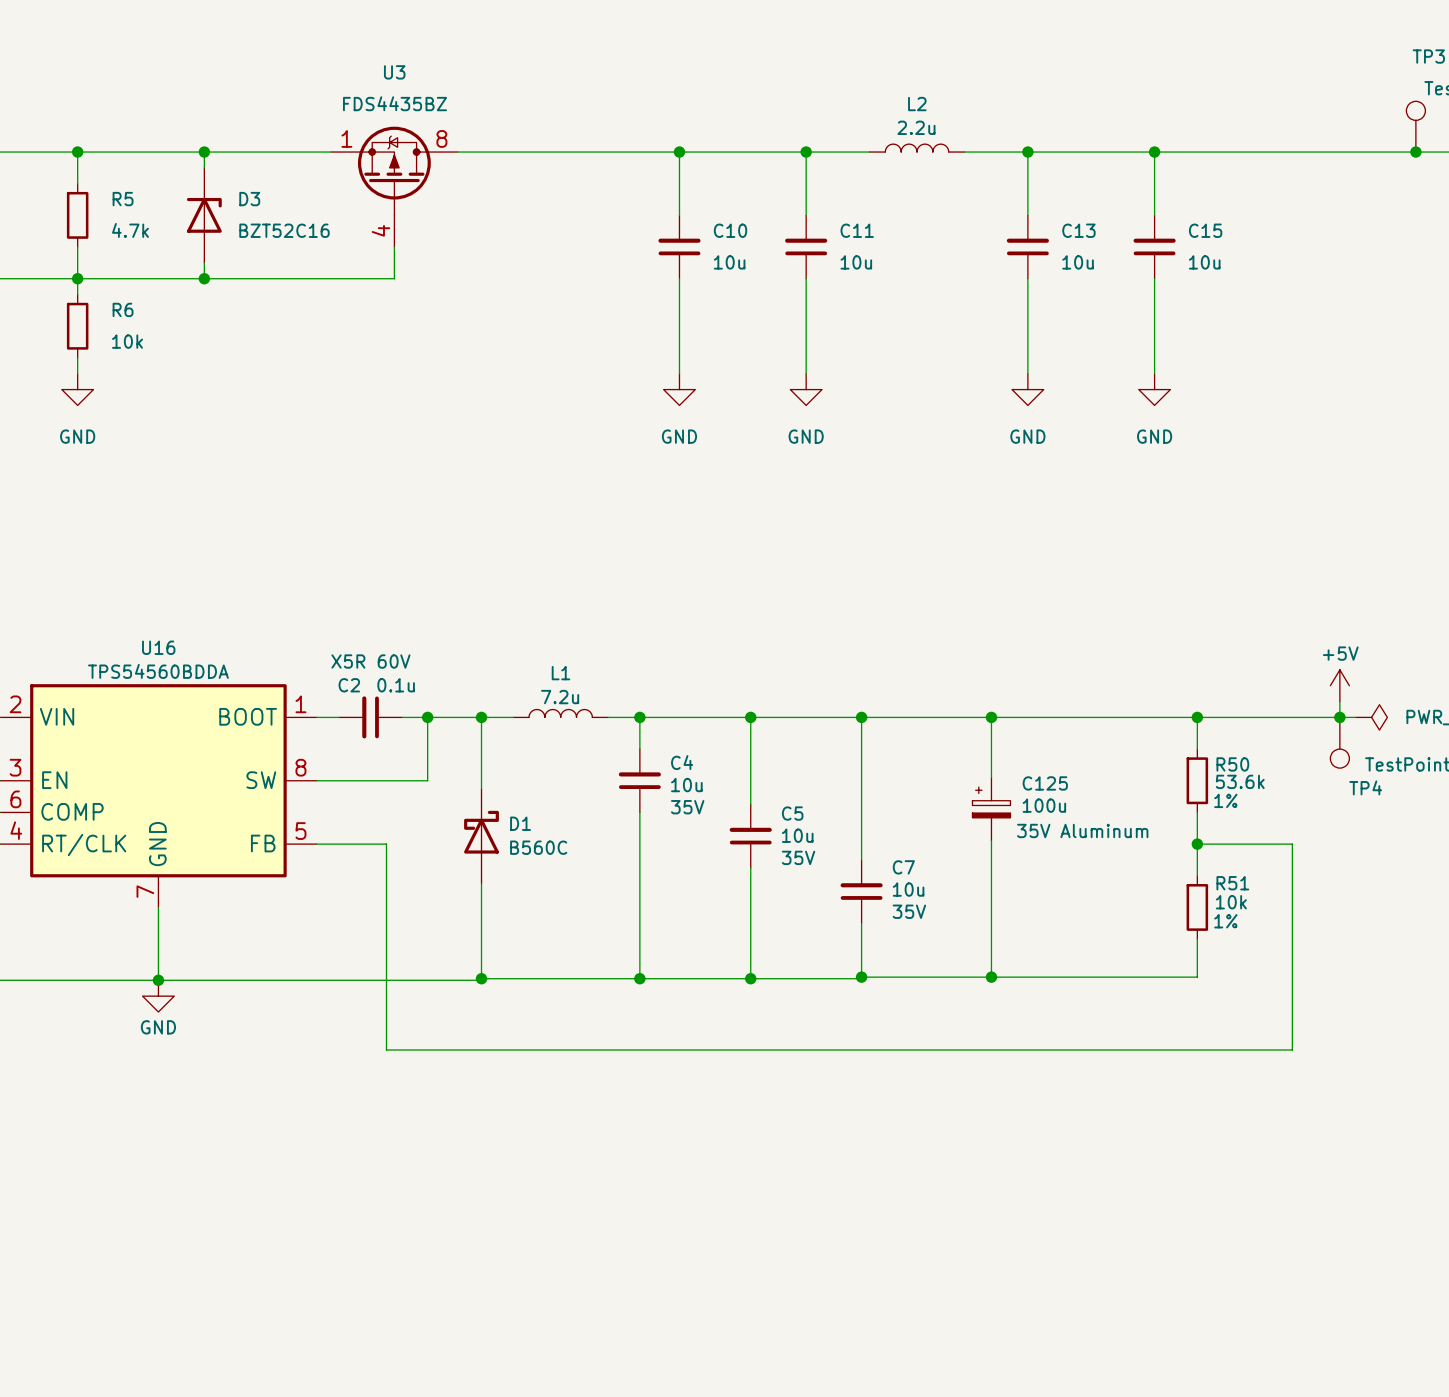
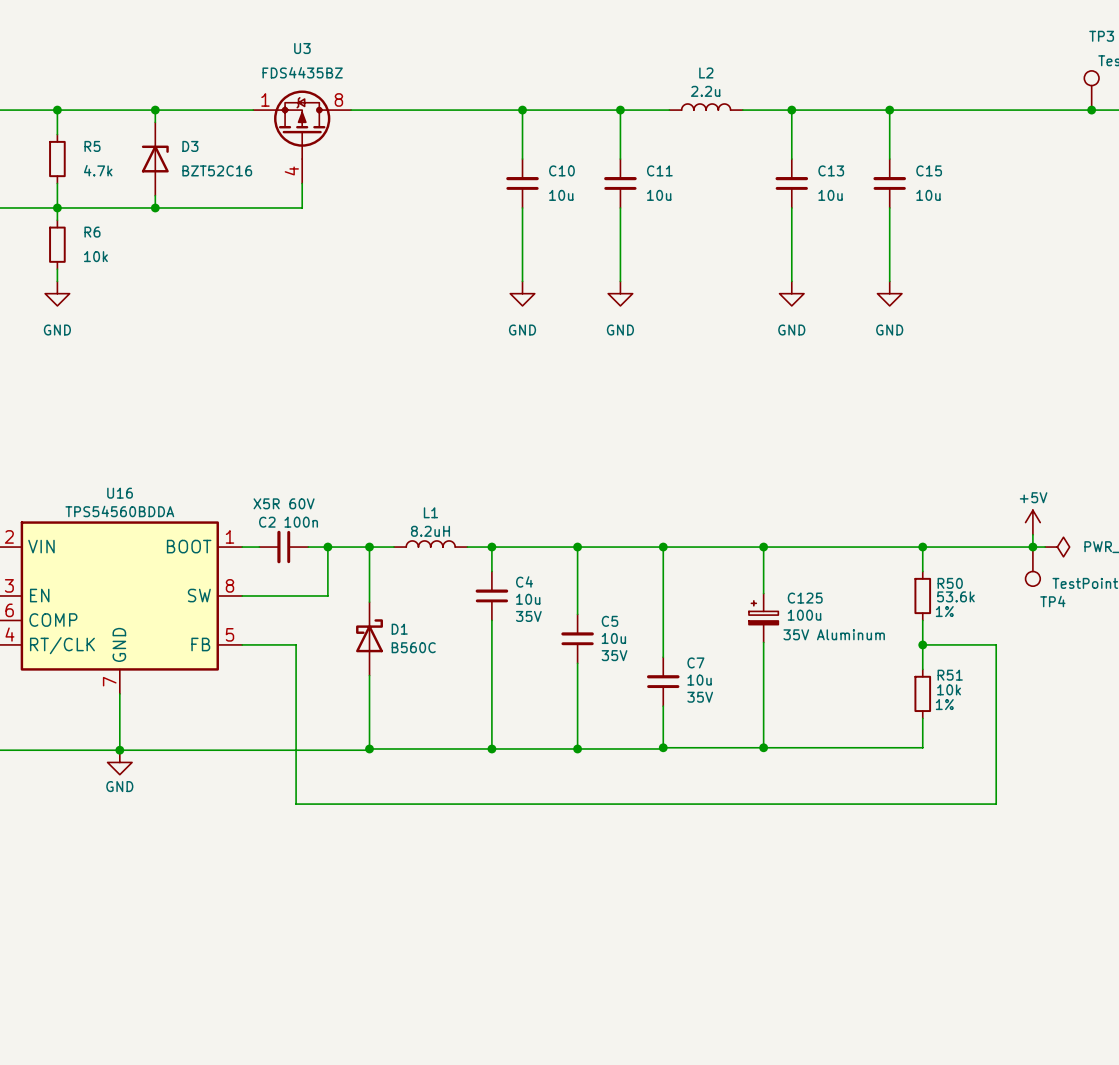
C2 value: 0.1u (396, 685) -> 100n (301, 522)
L1 value: 7.2u (560, 697) -> 8.2uH (430, 531)

